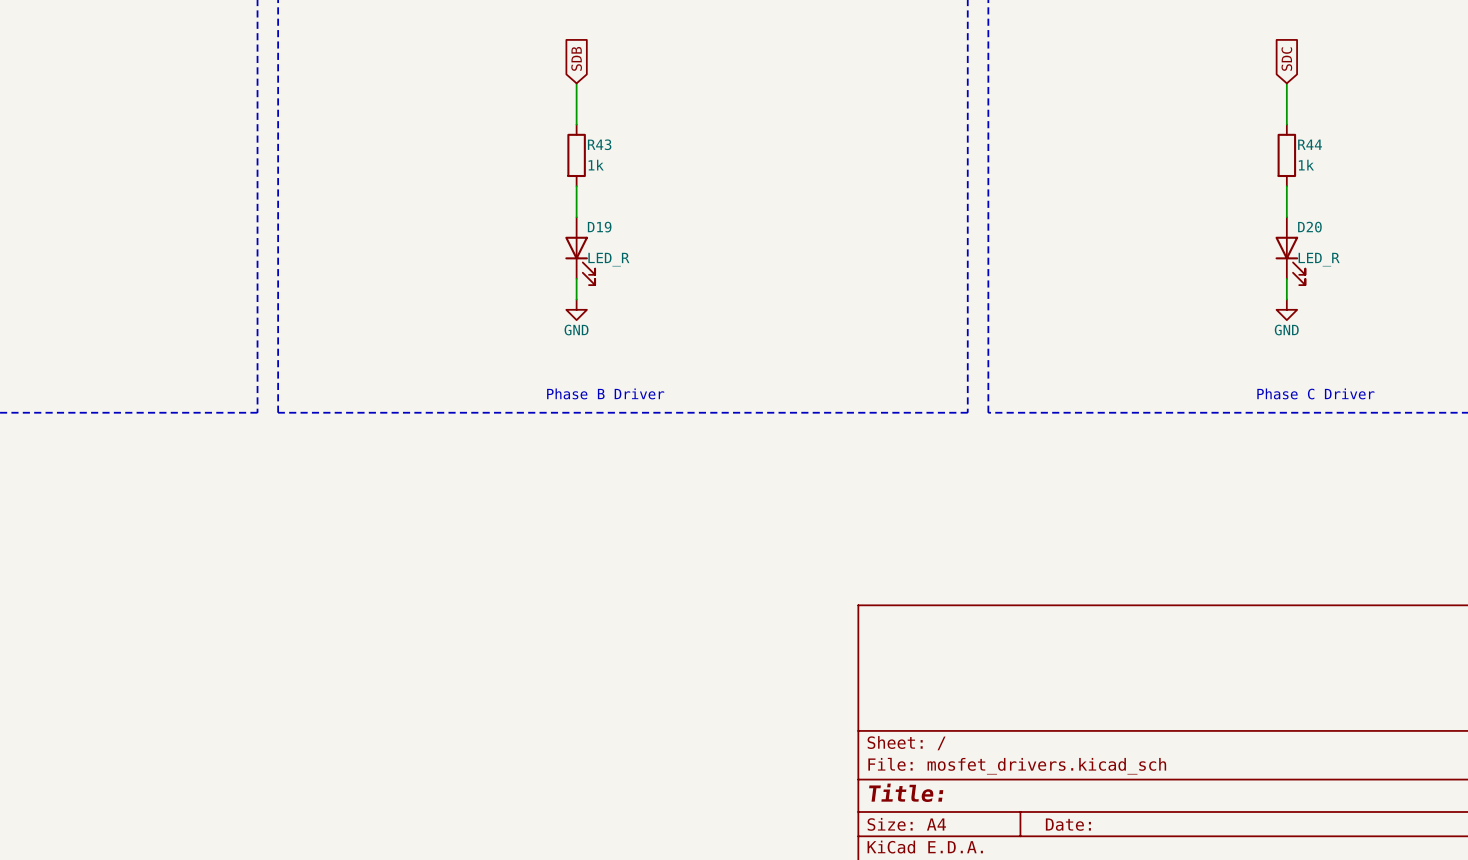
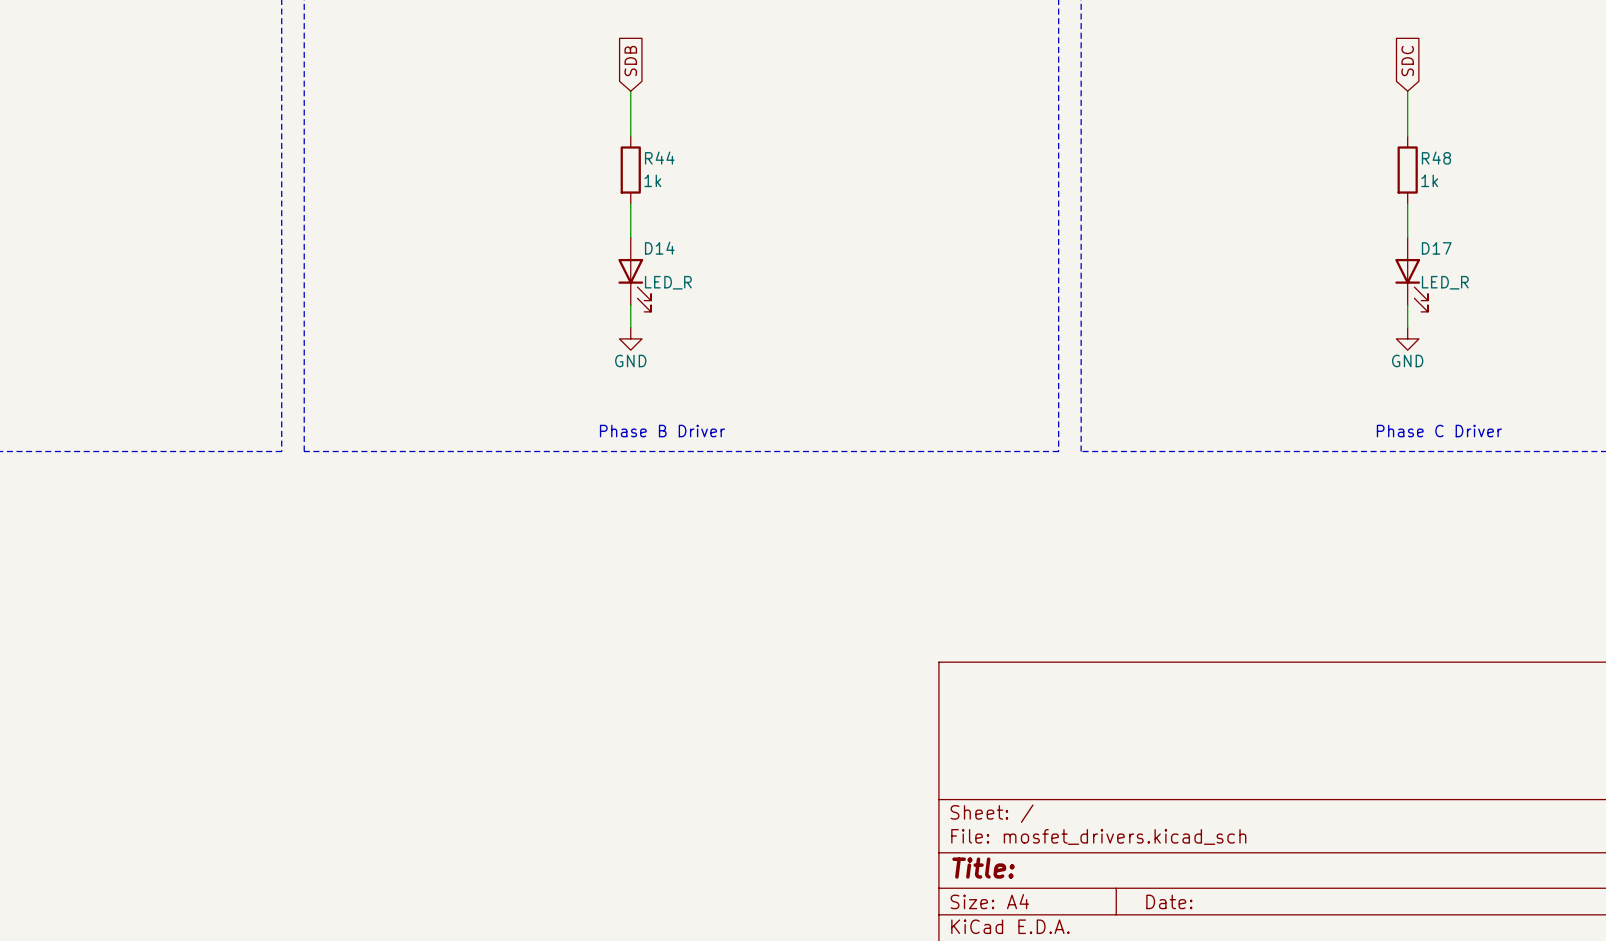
R43 name: R43 (599, 144) -> R44 (659, 158)
R44 name: R44 (1310, 144) -> R48 (1436, 158)
D19 name: D19 (599, 227) -> D14 (659, 248)
D20 name: D20 (1309, 227) -> D17 (1436, 248)

